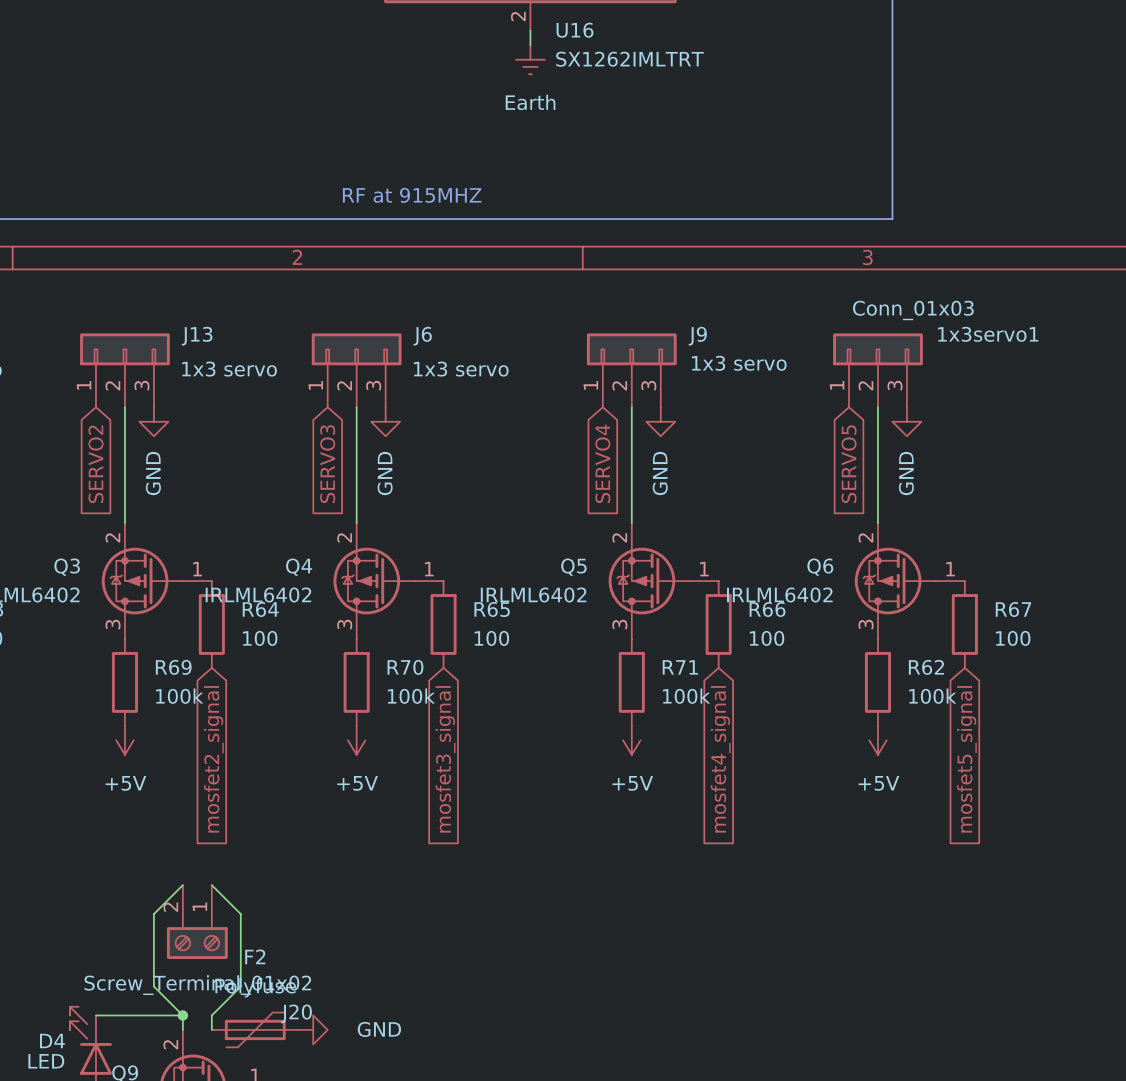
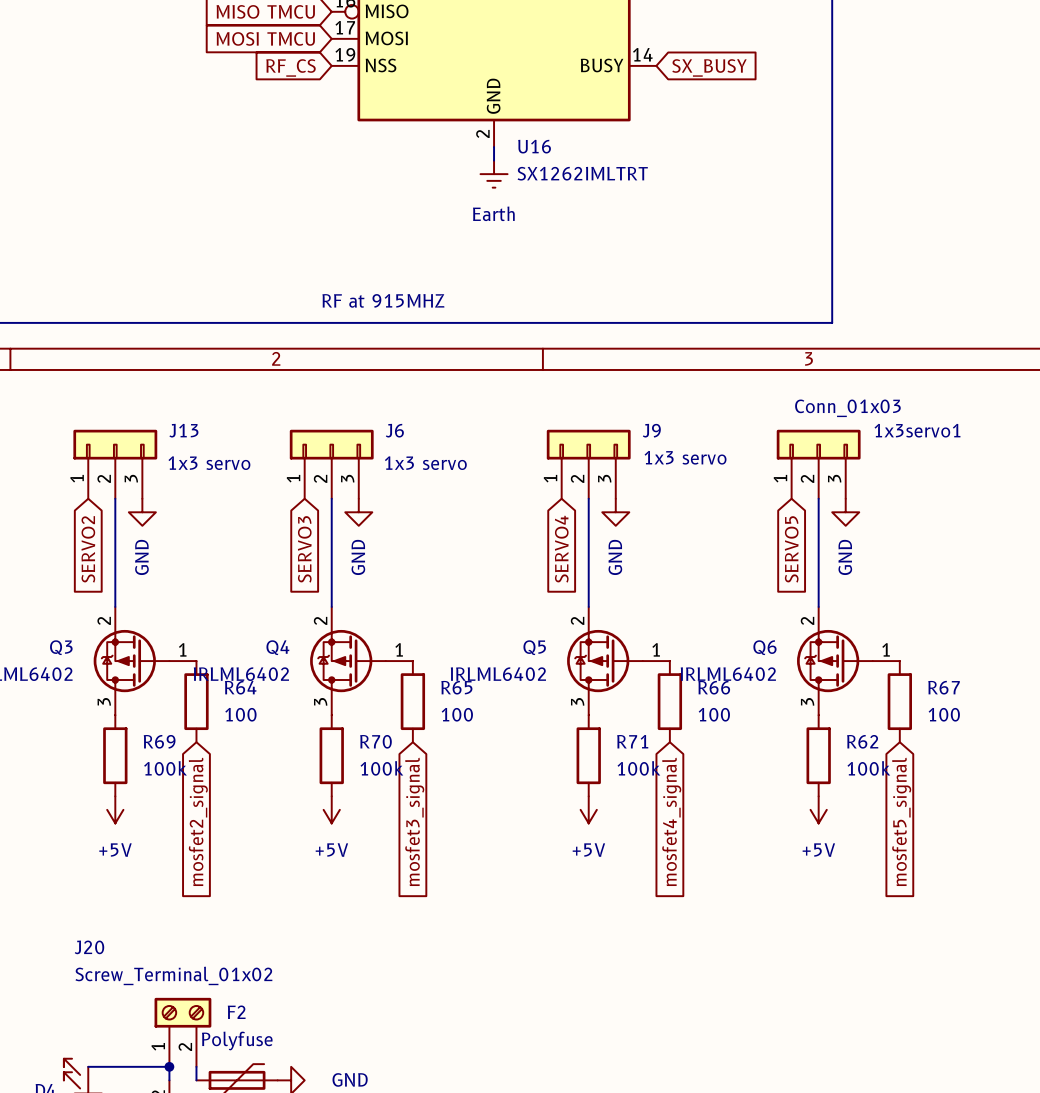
wire: (182, 885) (153, 914) (153, 986) (182, 1015) -> none
wire: (211, 885) (240, 914) (240, 986) (211, 1015) -> none
J20 position: (197, 922) -> (182, 1032)
J20 rotation: 0° (197, 943) -> 180° (182, 1012)

